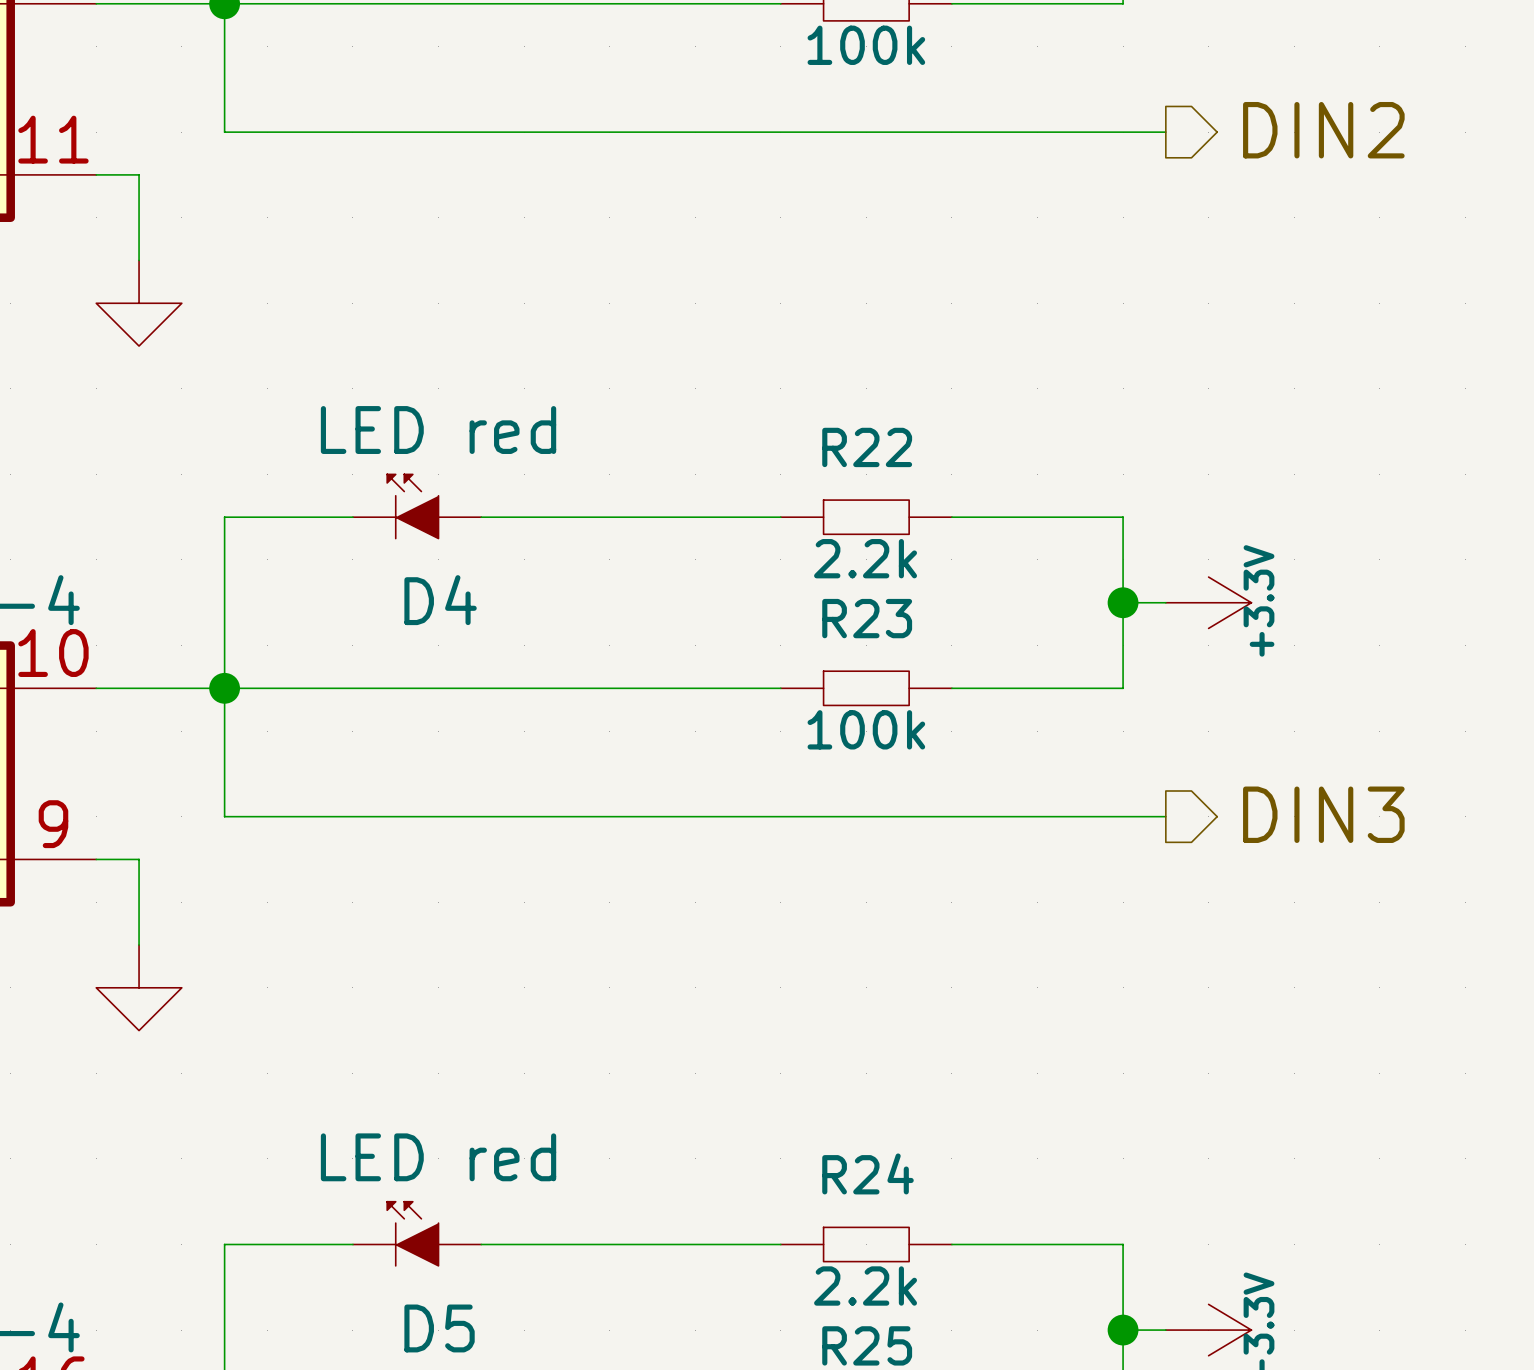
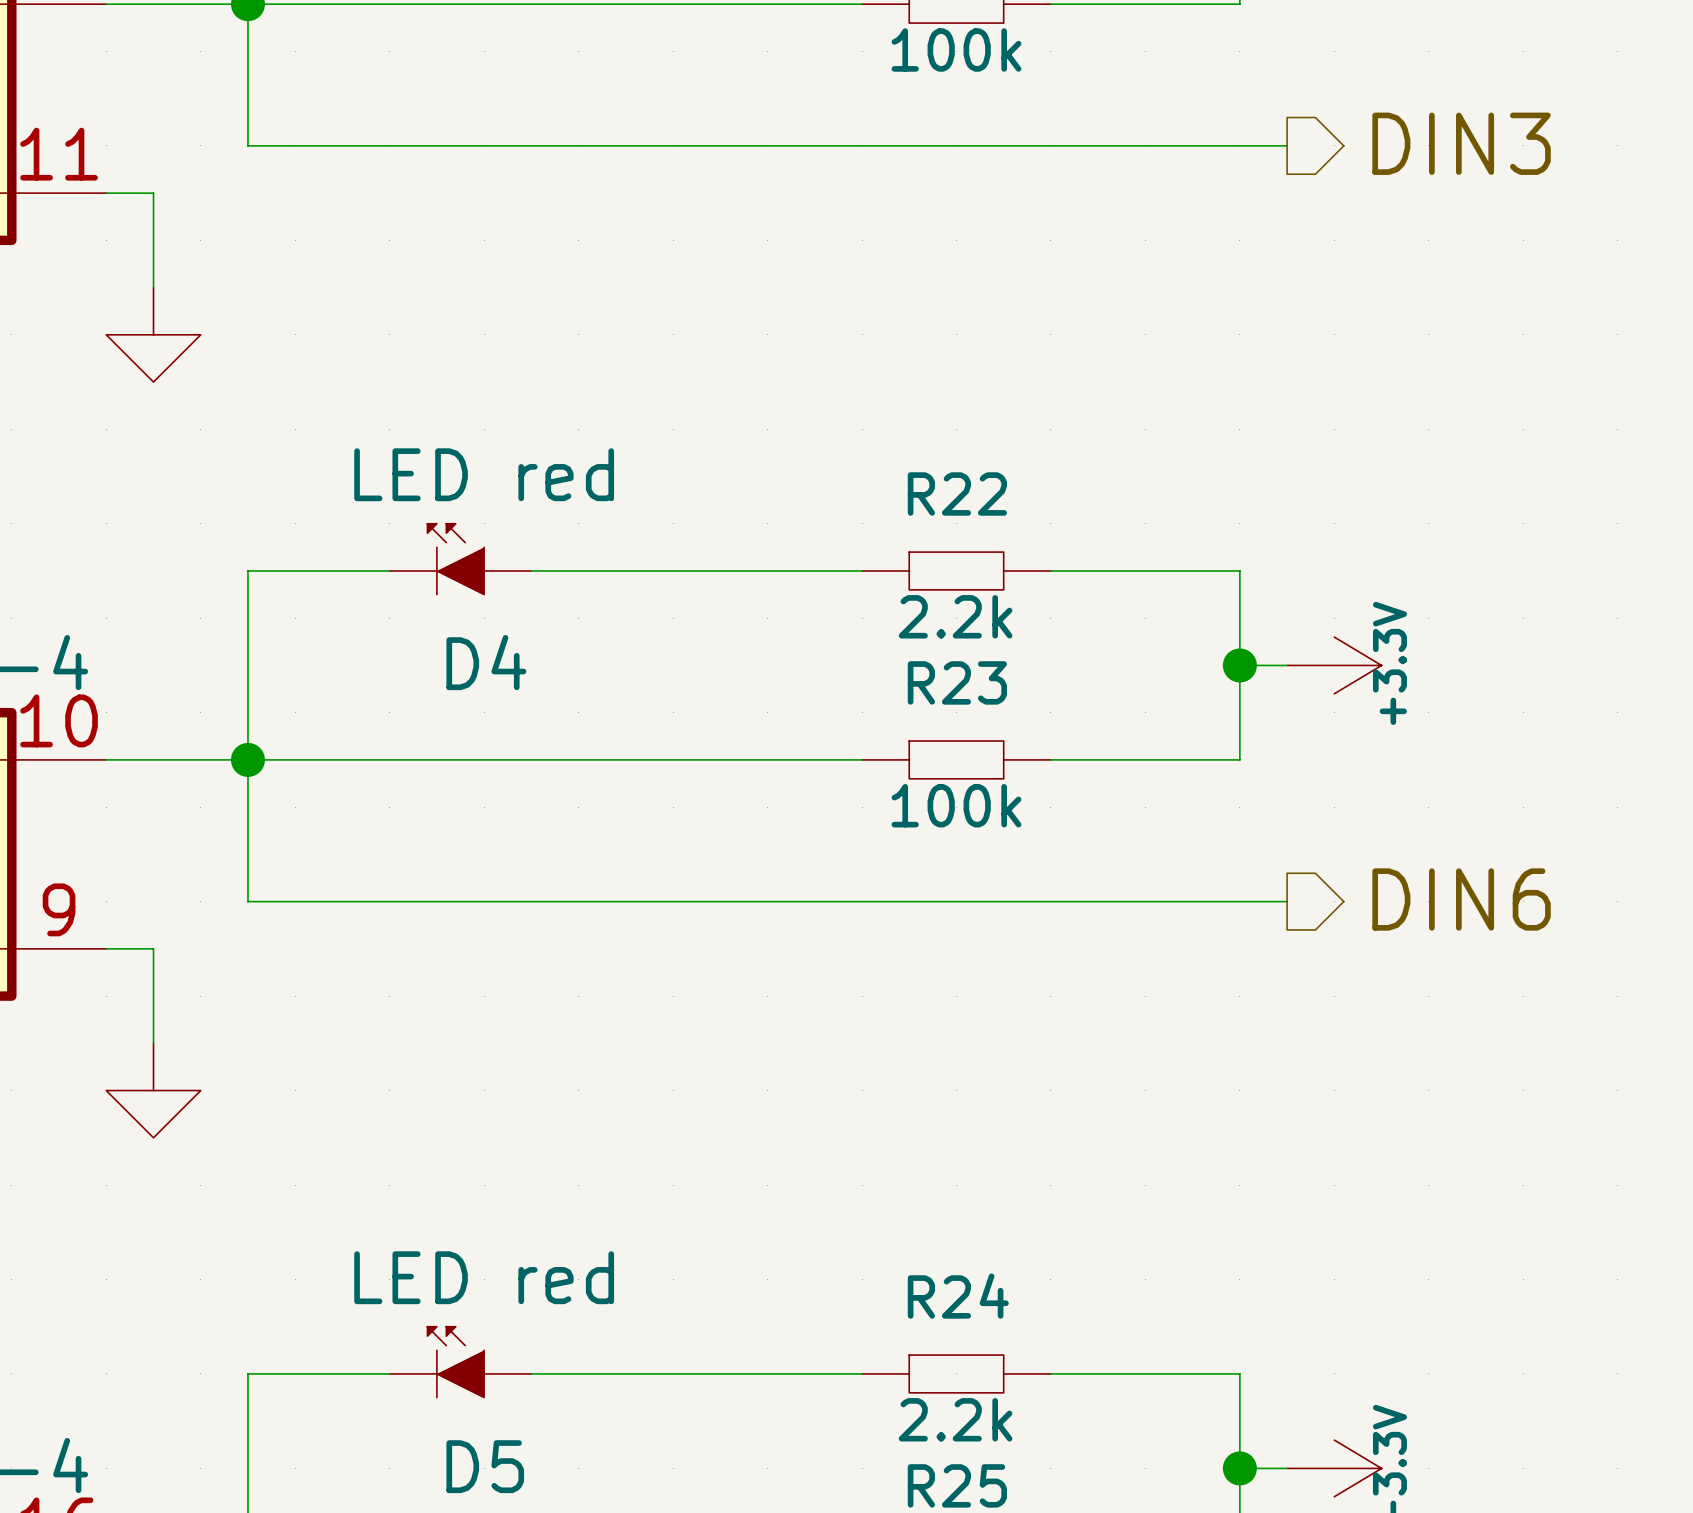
hierarchical label: DIN2 (1323, 130) -> DIN3 (1461, 143)
hierarchical label: DIN3 (1323, 814) -> DIN6 (1461, 899)

